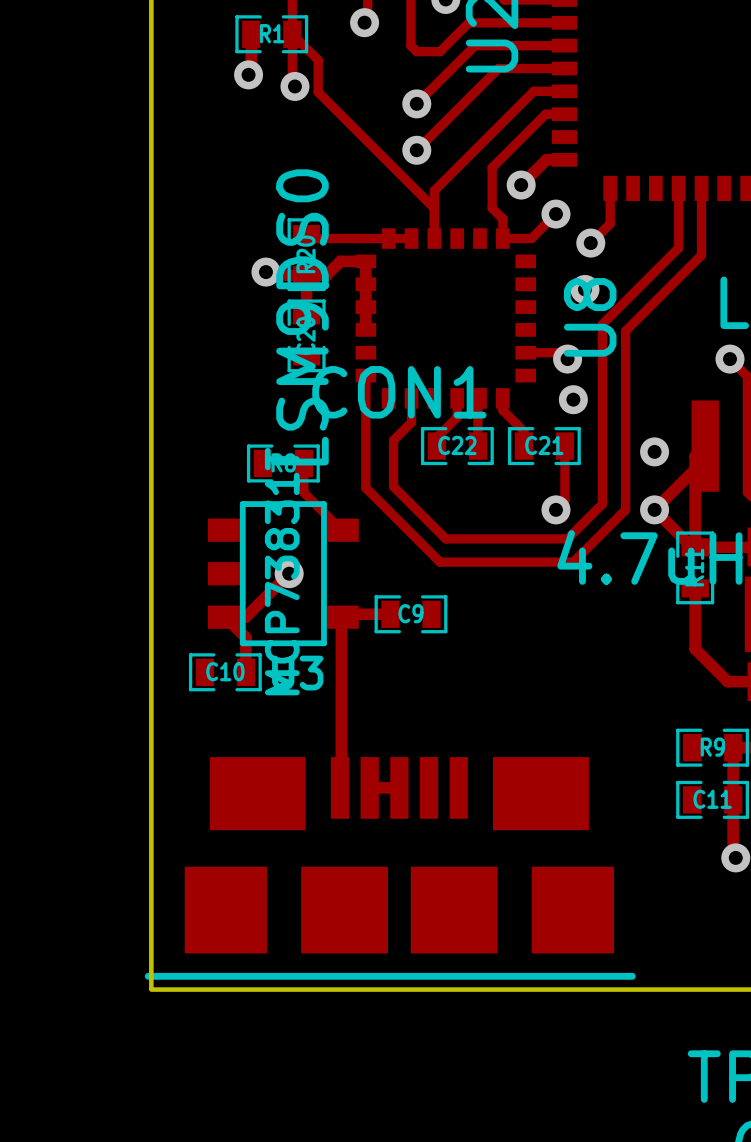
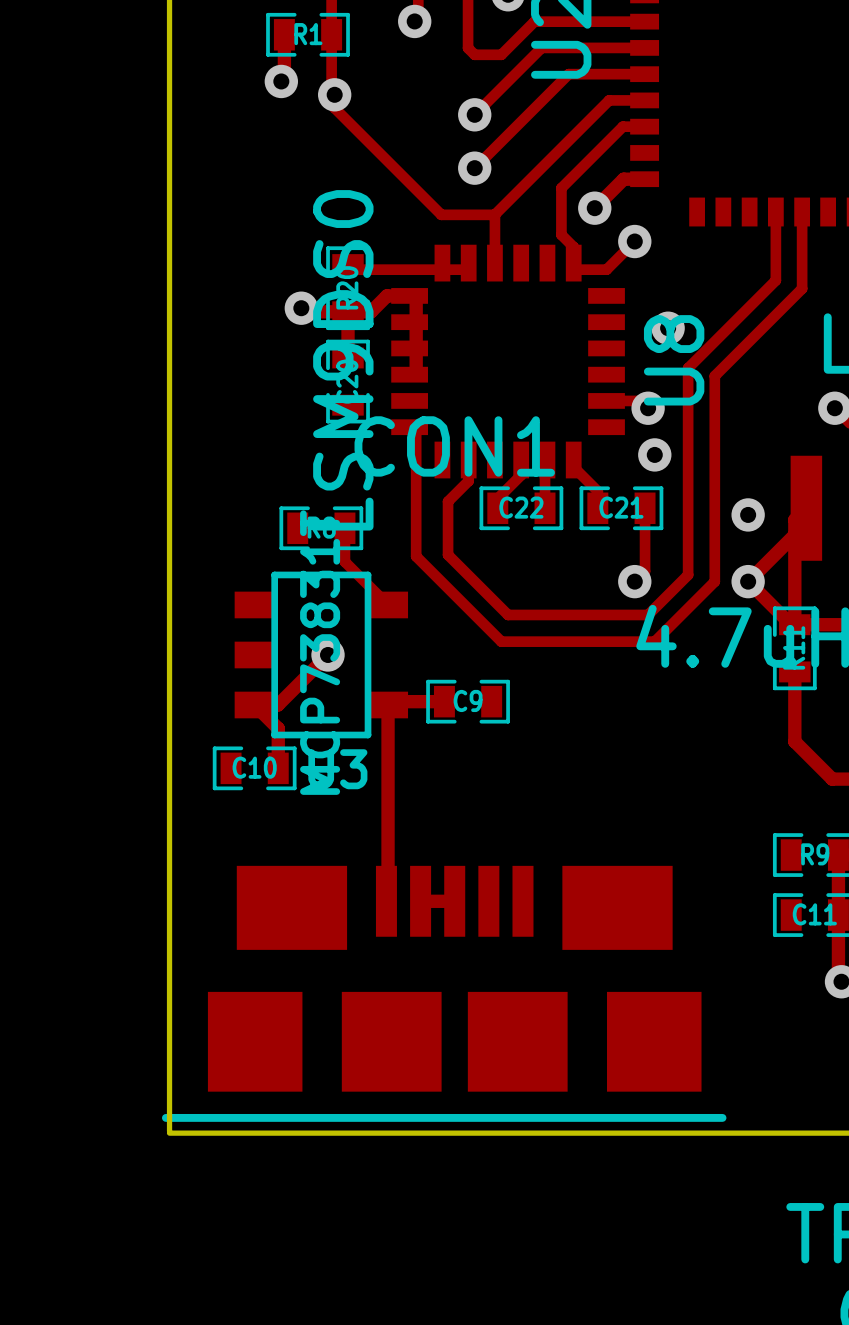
track: (292, 34) (318, 60) (318, 92) (434, 208) -> none
track: none -> (334, 94) (334, 108) (441, 214) (494, 214)
track: (610, 188) (610, 223) (590, 243) -> none
U8 footprint: [355, 228, 536, 409] -> [391, 244, 625, 479]
via: (590, 243) -> none

